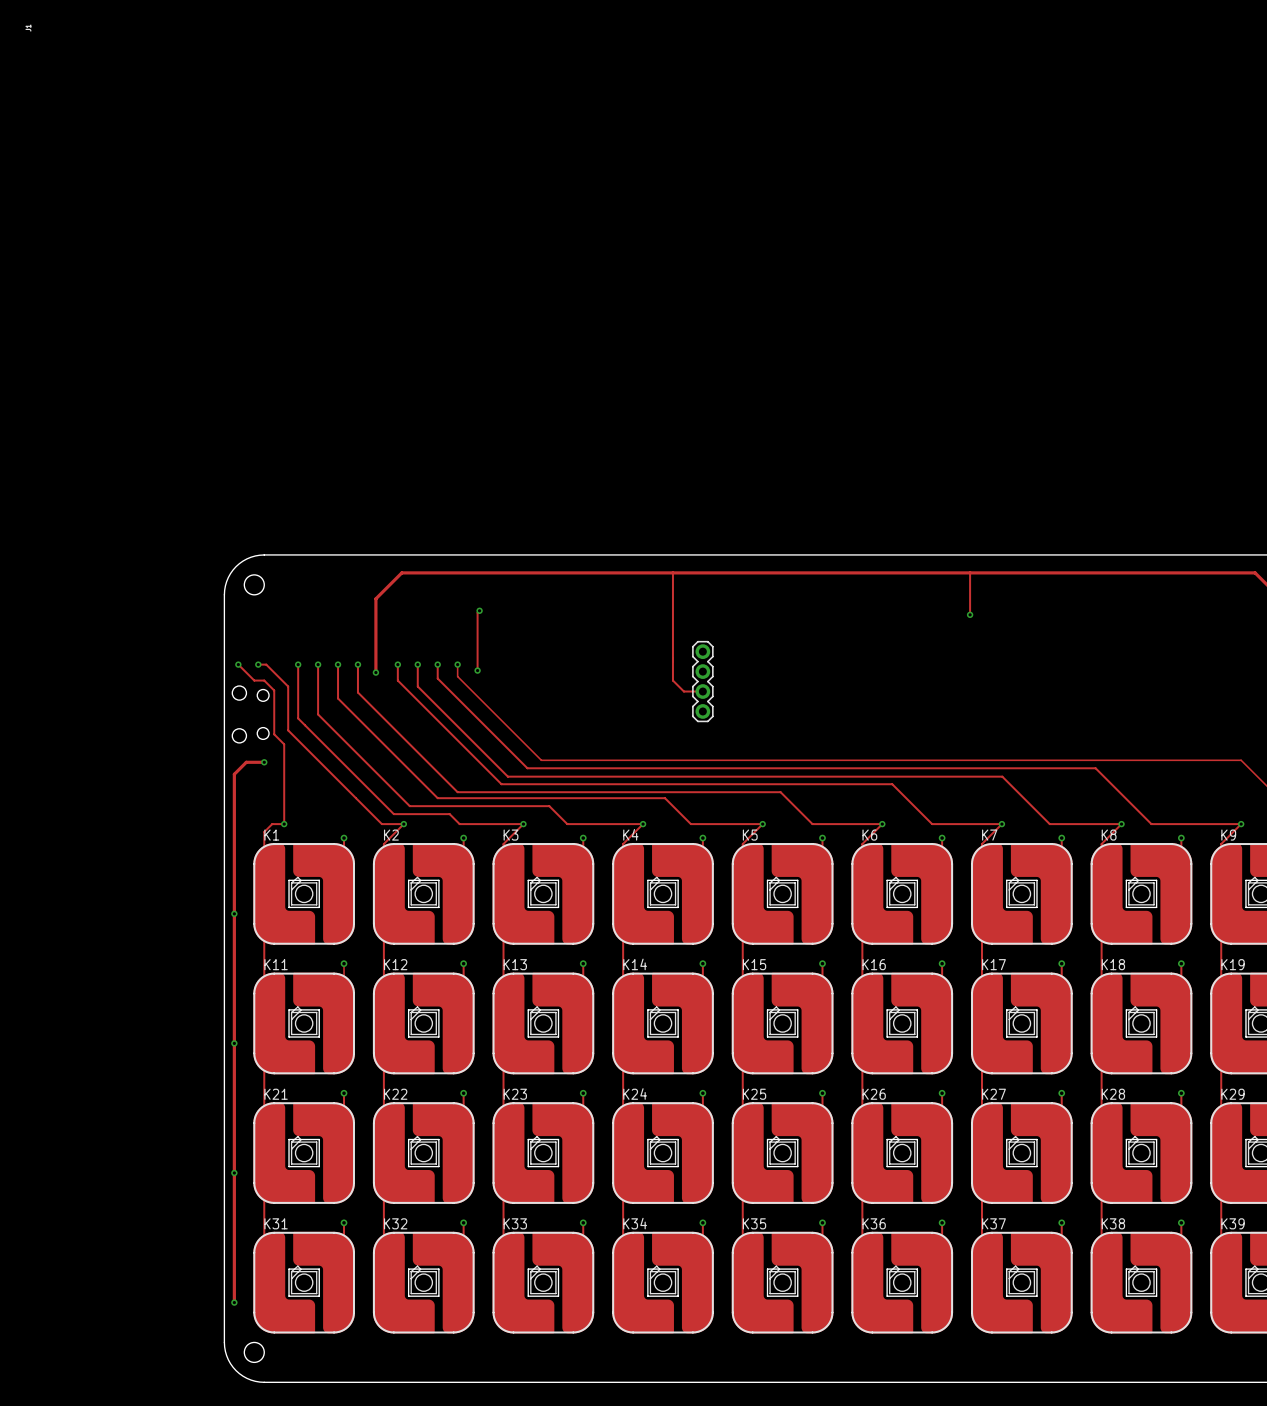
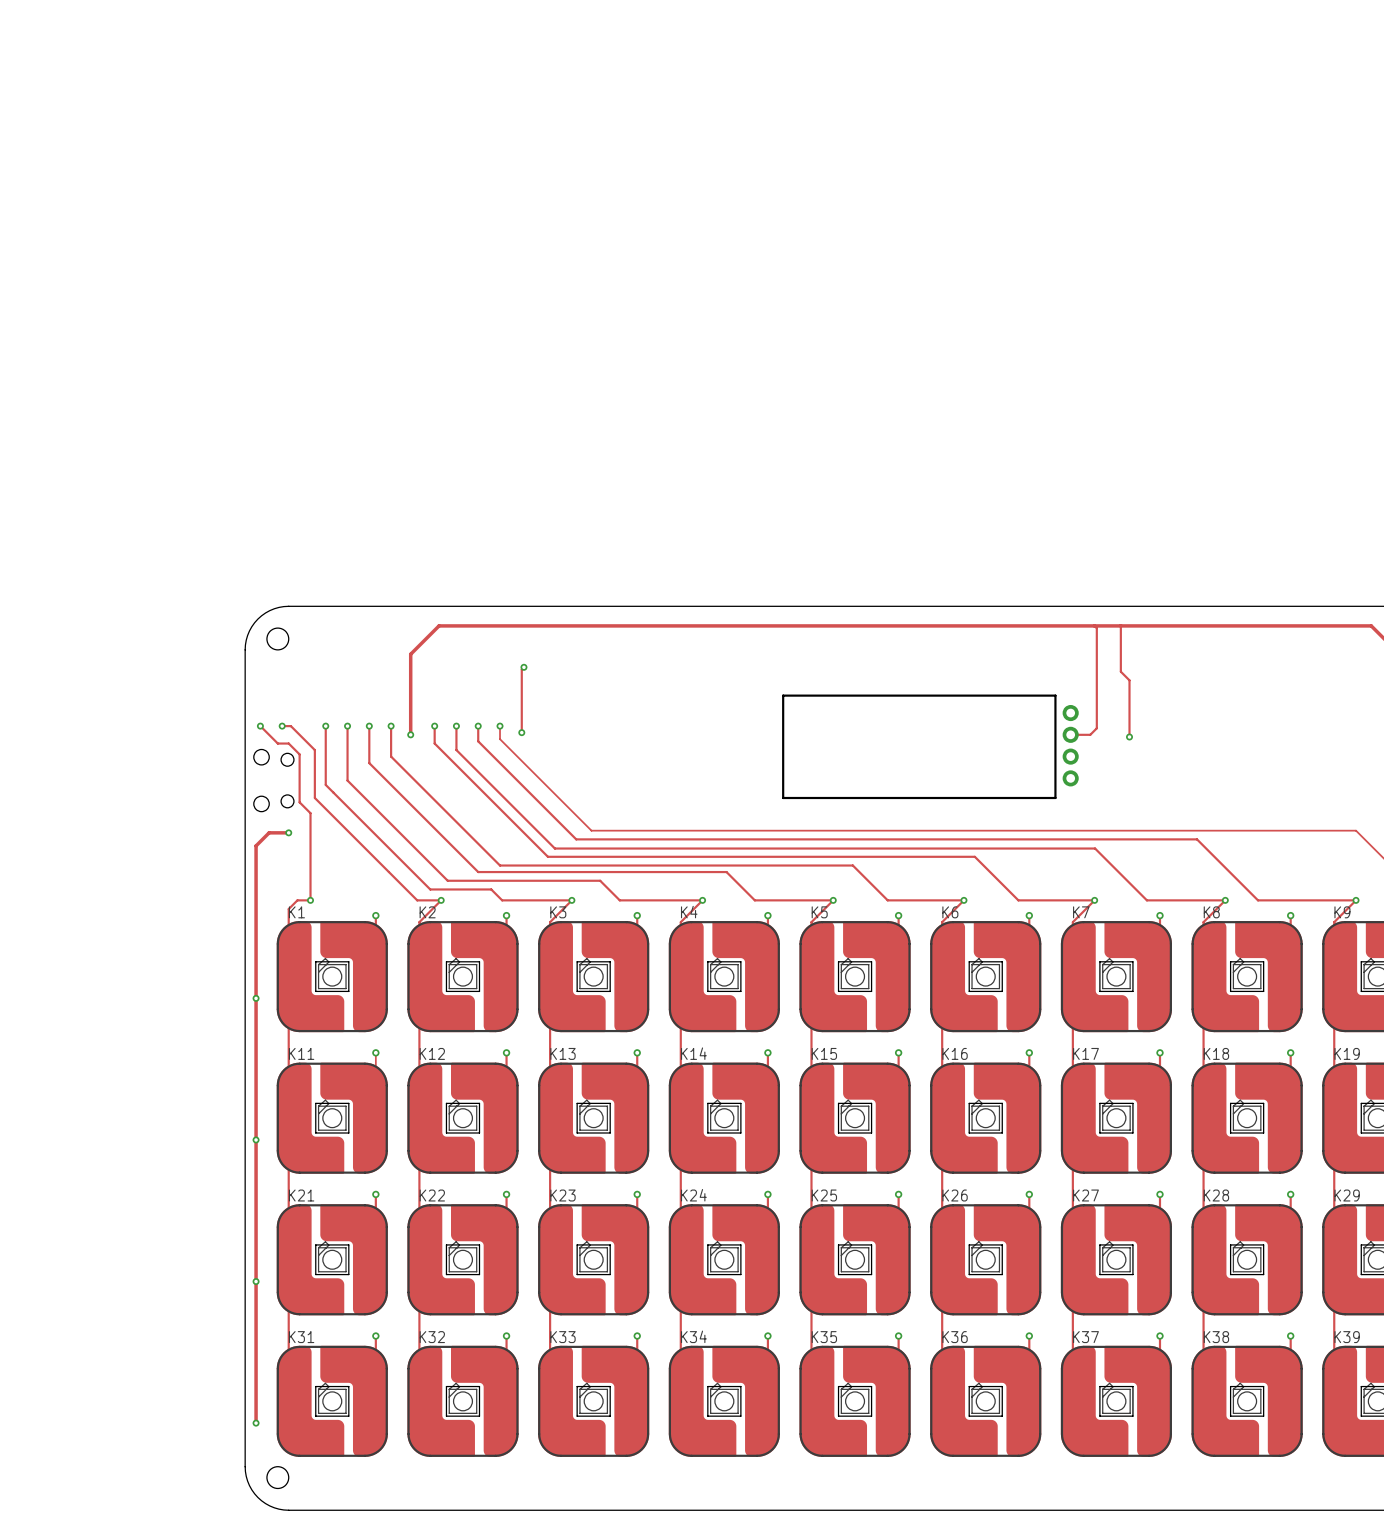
track: (672, 572) (672, 680) (683, 691) (702, 691) -> none
track: (970, 572) (970, 614) -> none
track: none -> (1094, 625) (1096, 628) (1096, 728) (1090, 734) (1070, 734)
track: none -> (1120, 625) (1120, 671) (1129, 680) (1129, 737)
via: (970, 614) -> none
board edge: none -> (783, 695) (1055, 695) (1055, 797) (783, 797) (783, 695)
via: none -> (1129, 737)
part: (702, 681) -> none
part: none -> (1070, 745)

